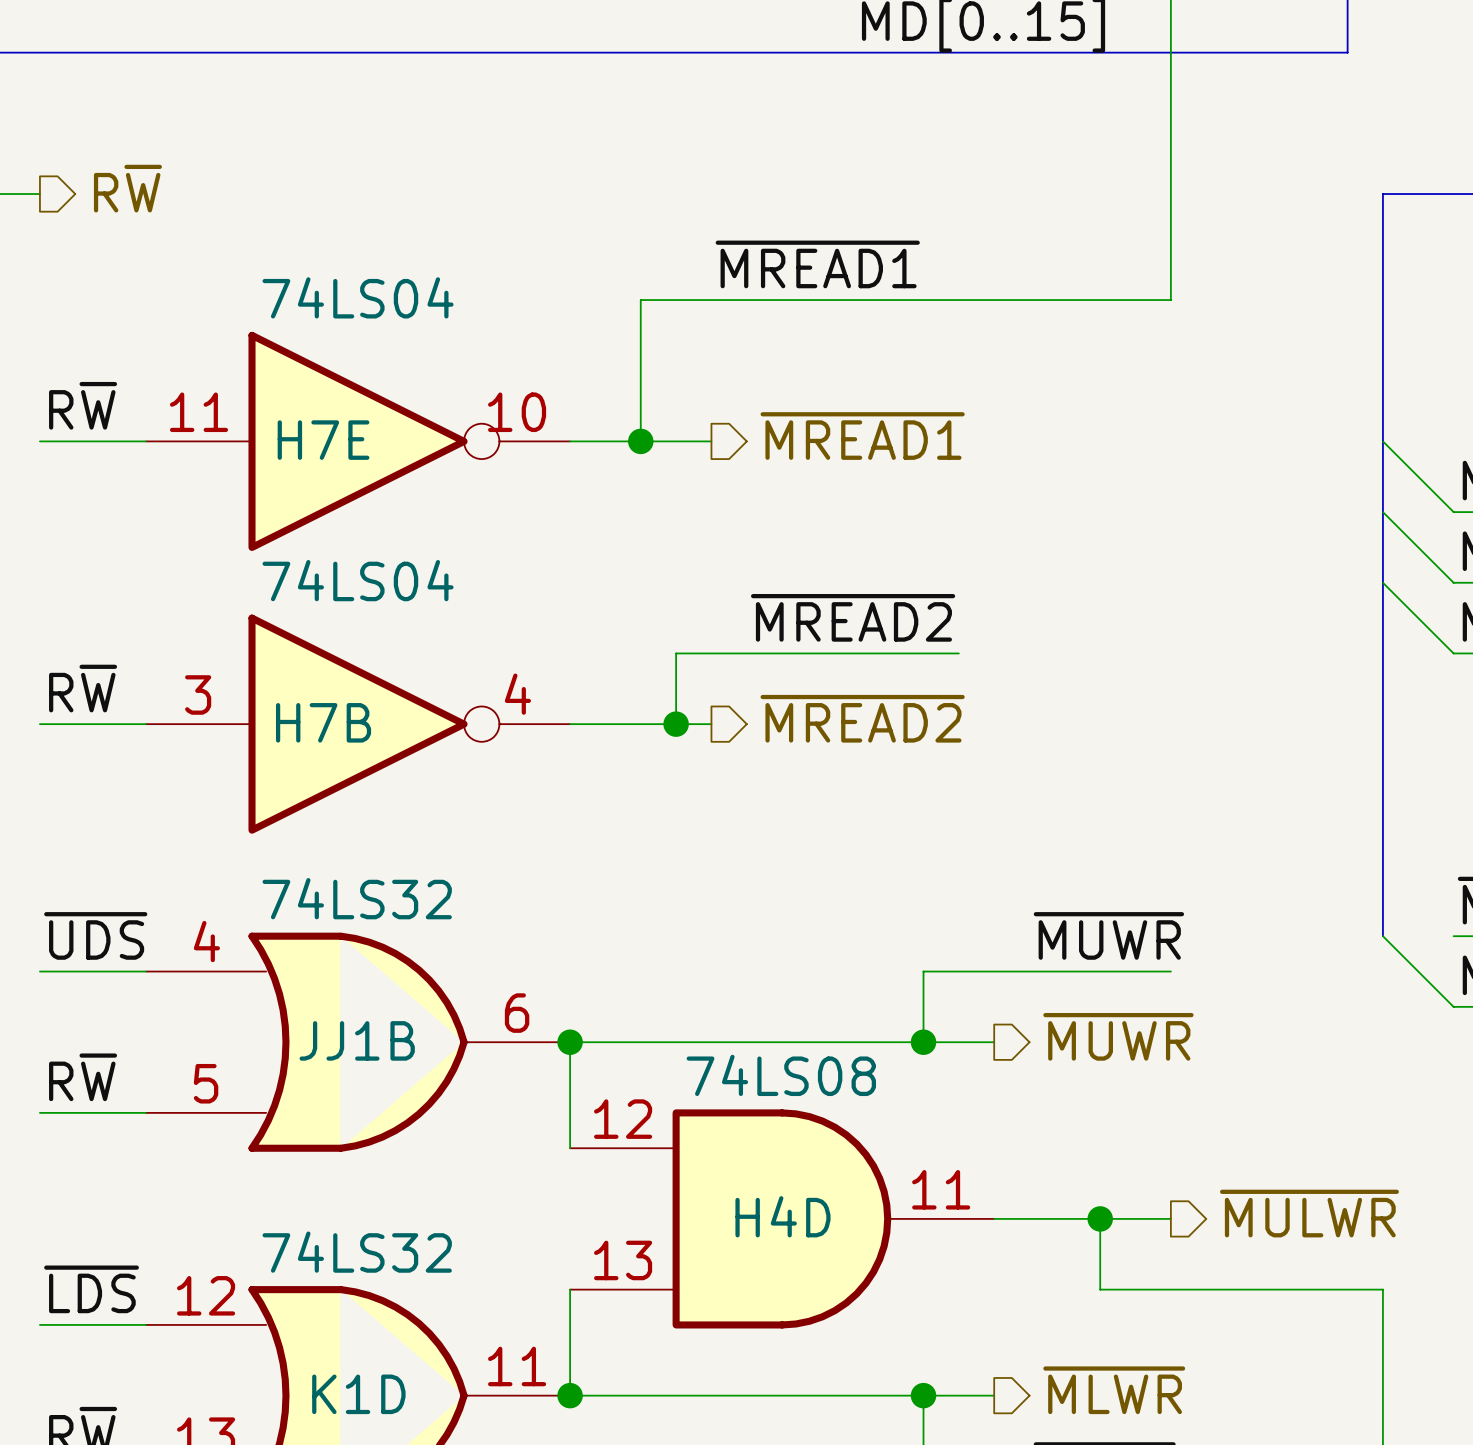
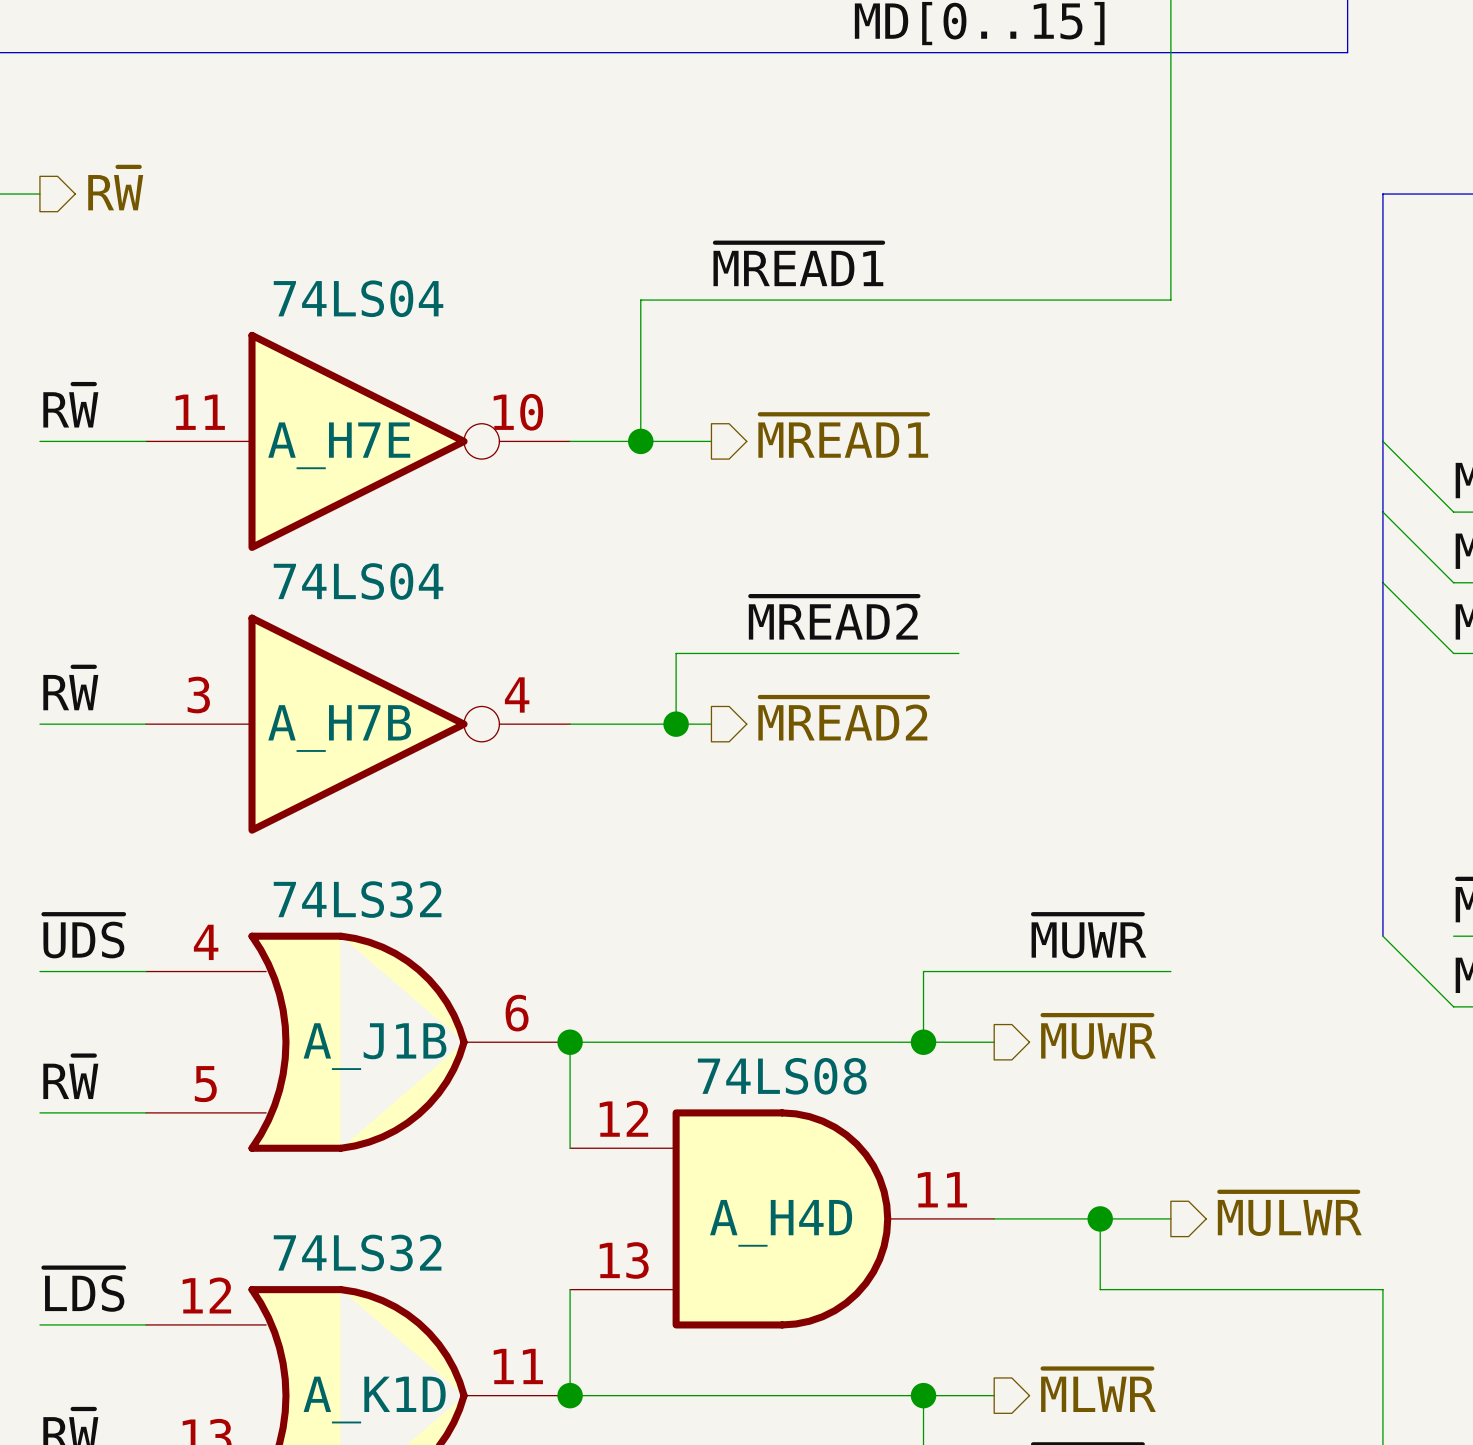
H7E name: H7E (323, 440) -> A_H7E (339, 445)
H7B name: H7B (323, 722) -> A_H7B (339, 728)
JJ1B name: JJ1B (357, 1040) -> A_J1B (375, 1046)
H4D name: H4D (782, 1216) -> A_H4D (781, 1223)
K1D name: K1D (358, 1394) -> A_K1D (374, 1400)

